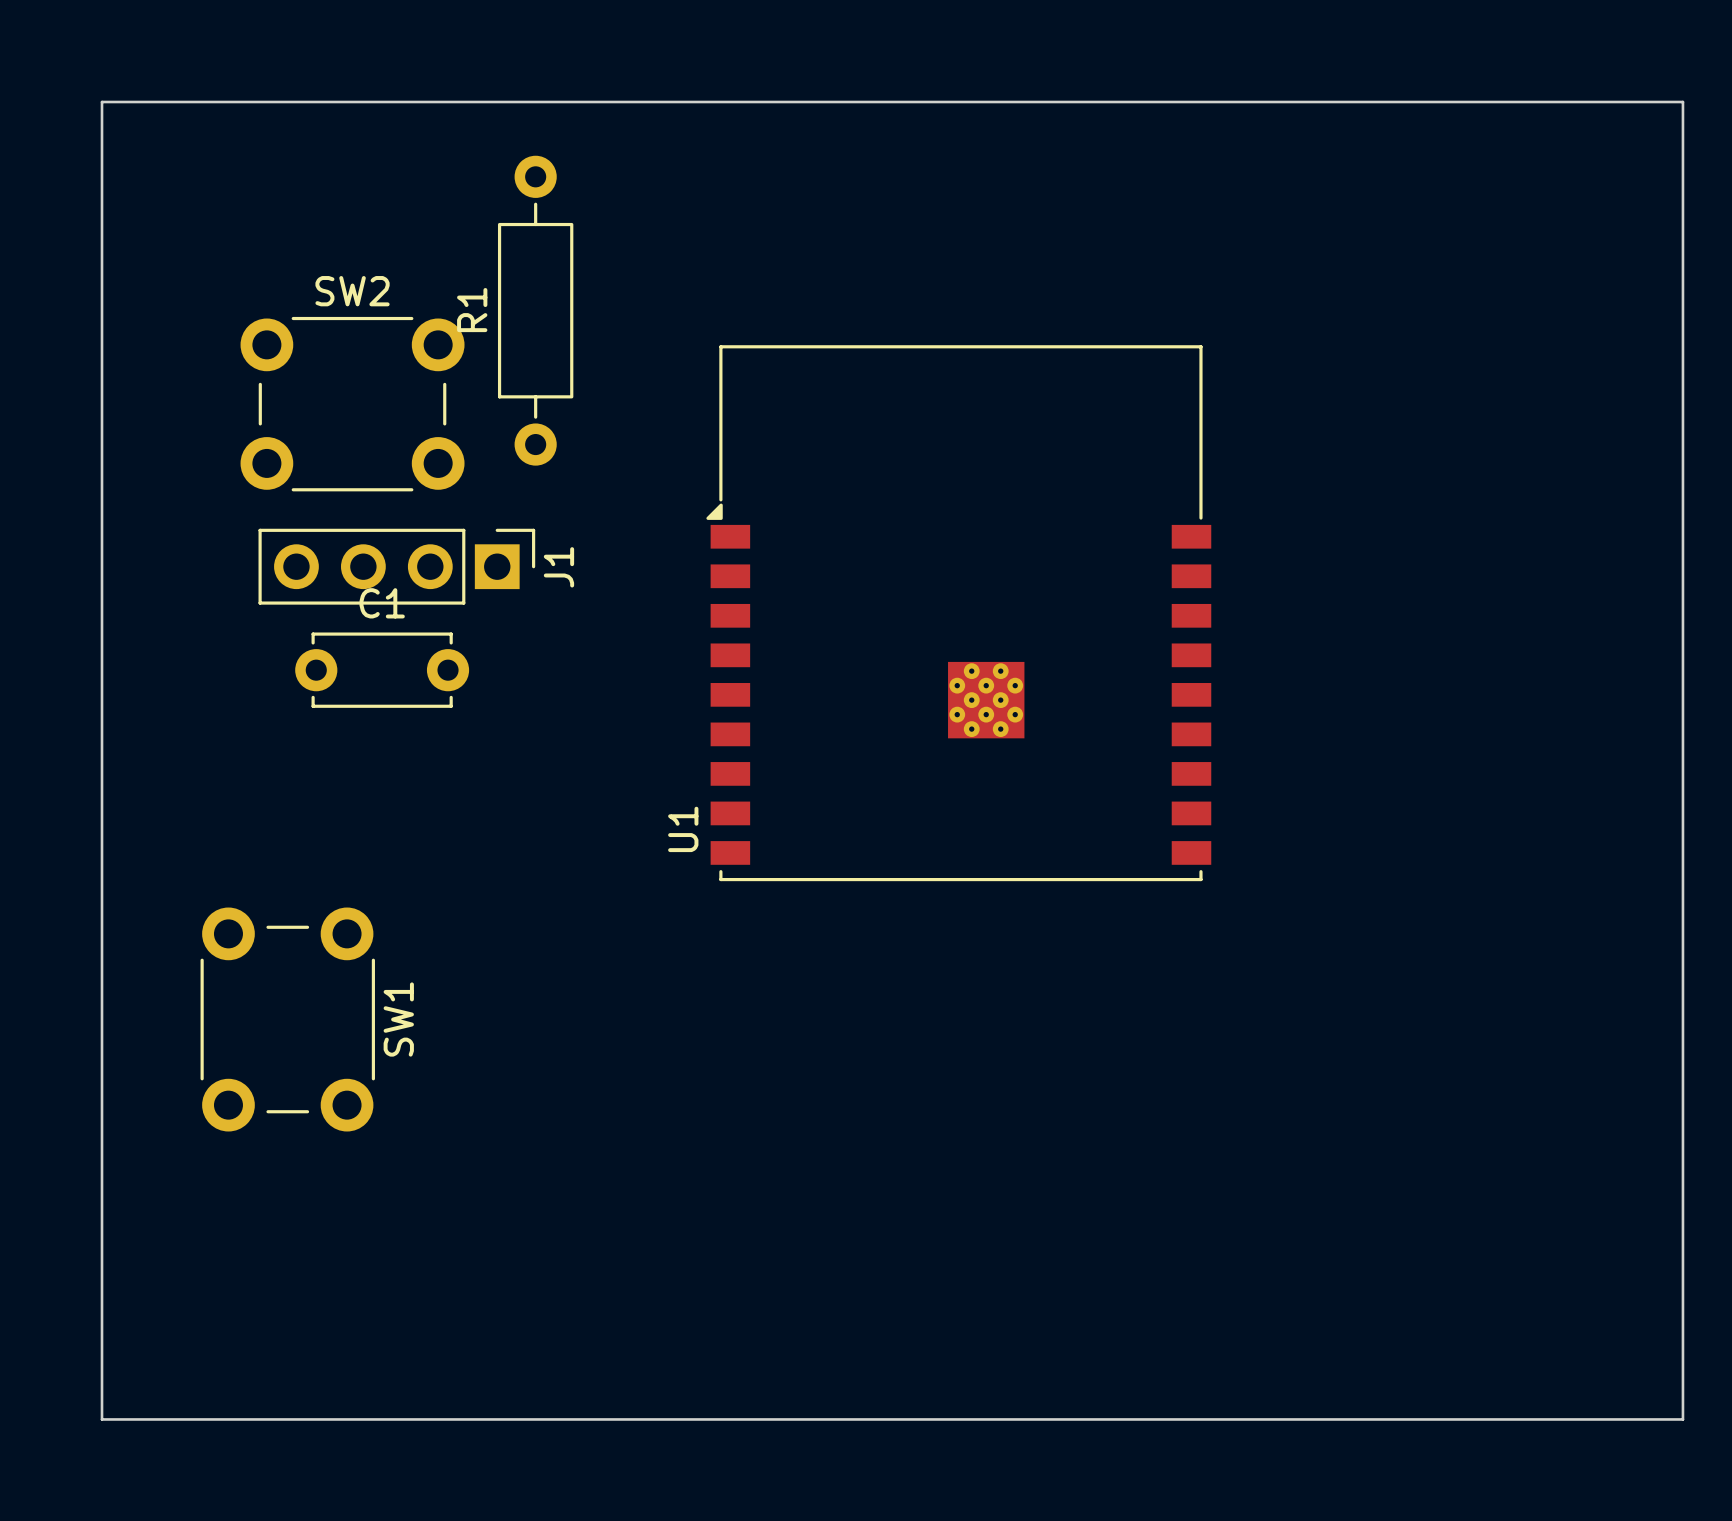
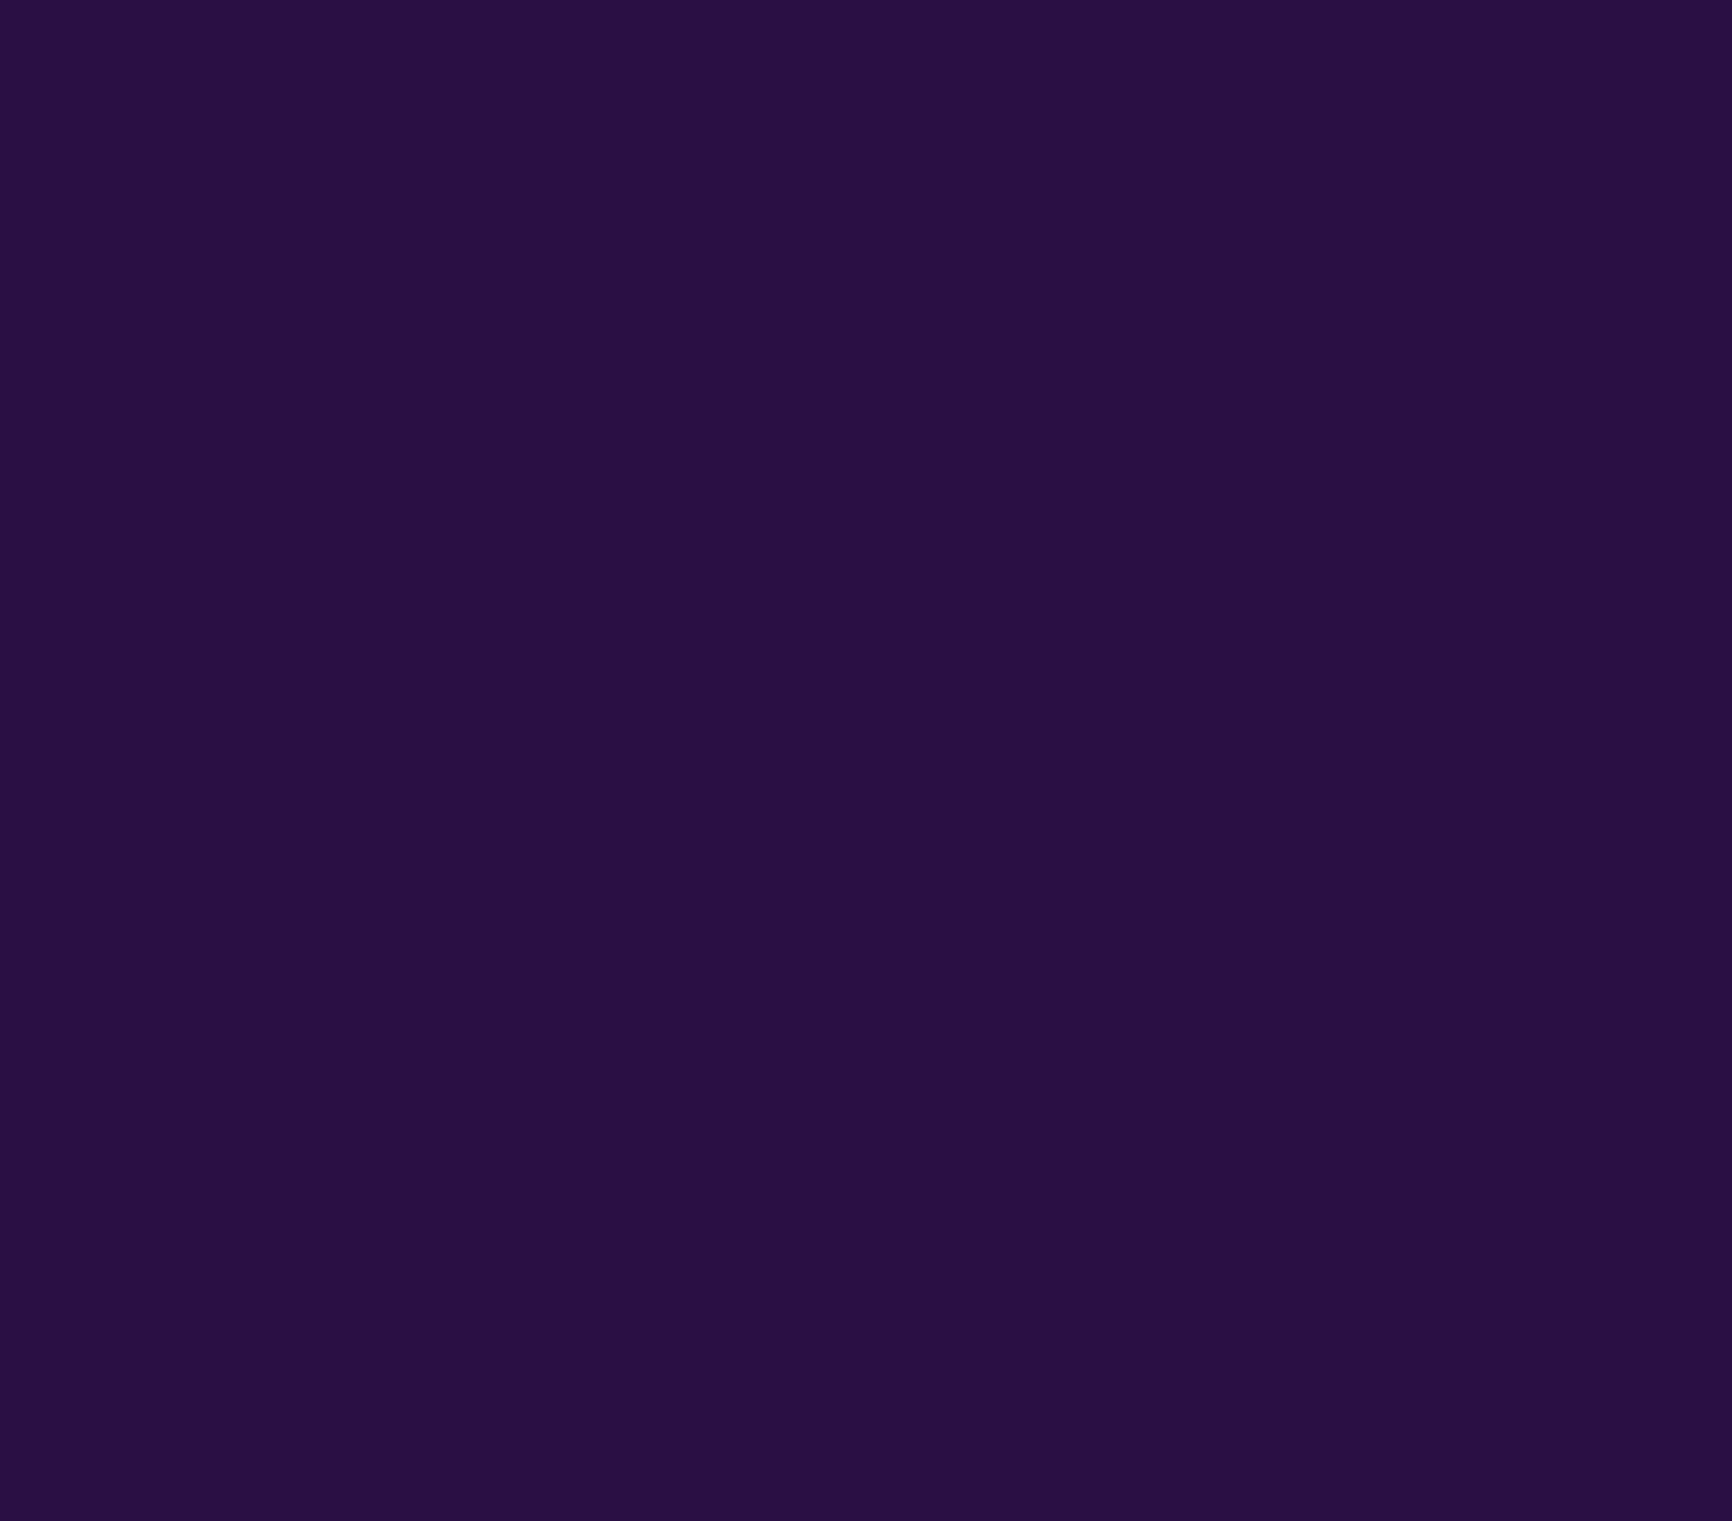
board edge: (102, 102) (1682, 102) (1682, 1419) (102, 1419) (102, 102) -> none
R1: (535, 310) -> none
SW2: (352, 404) -> none
J1: (396, 566) -> none
U1: (958, 613) -> none
C1: (382, 670) -> none
SW1: (287, 1019) -> none

